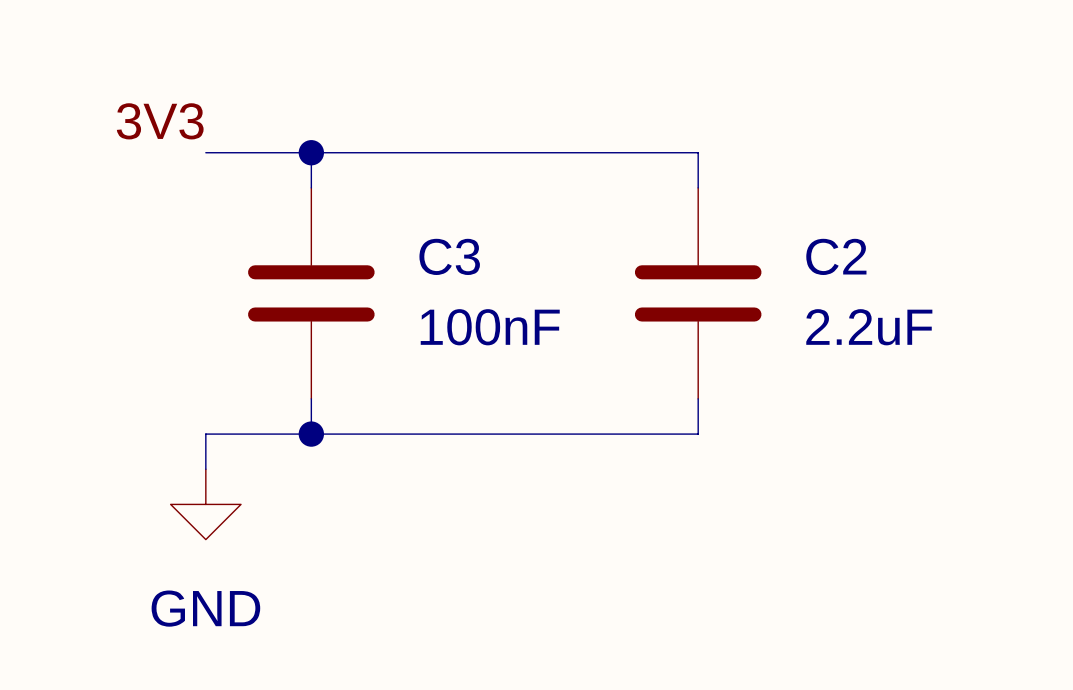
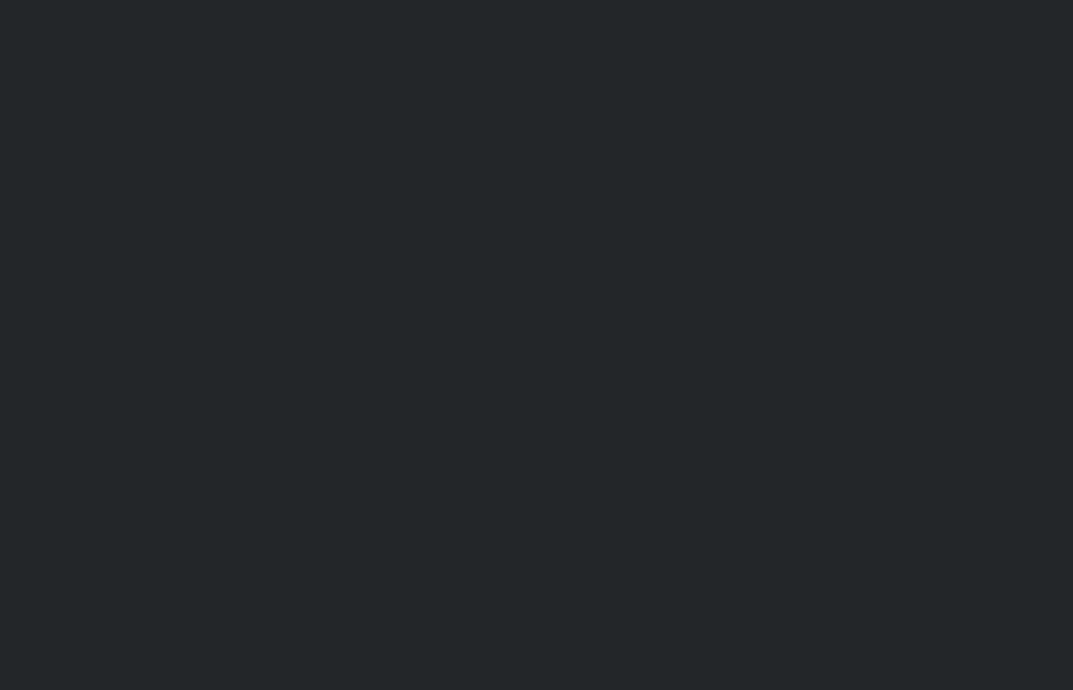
label: 3V3 (160, 121) -> none
wire: (205, 152) (698, 152) (698, 187) -> none
wire: (311, 152) (311, 187) -> none
junction: (311, 152) -> none
C3: 100nF (311, 293) -> none
C2: 2.2uF (698, 293) -> none
wire: (311, 398) (311, 434) -> none
wire: (698, 398) (698, 434) (205, 434) (205, 469) -> none
junction: (311, 434) -> none
power symbol: GND (205, 504) -> none

